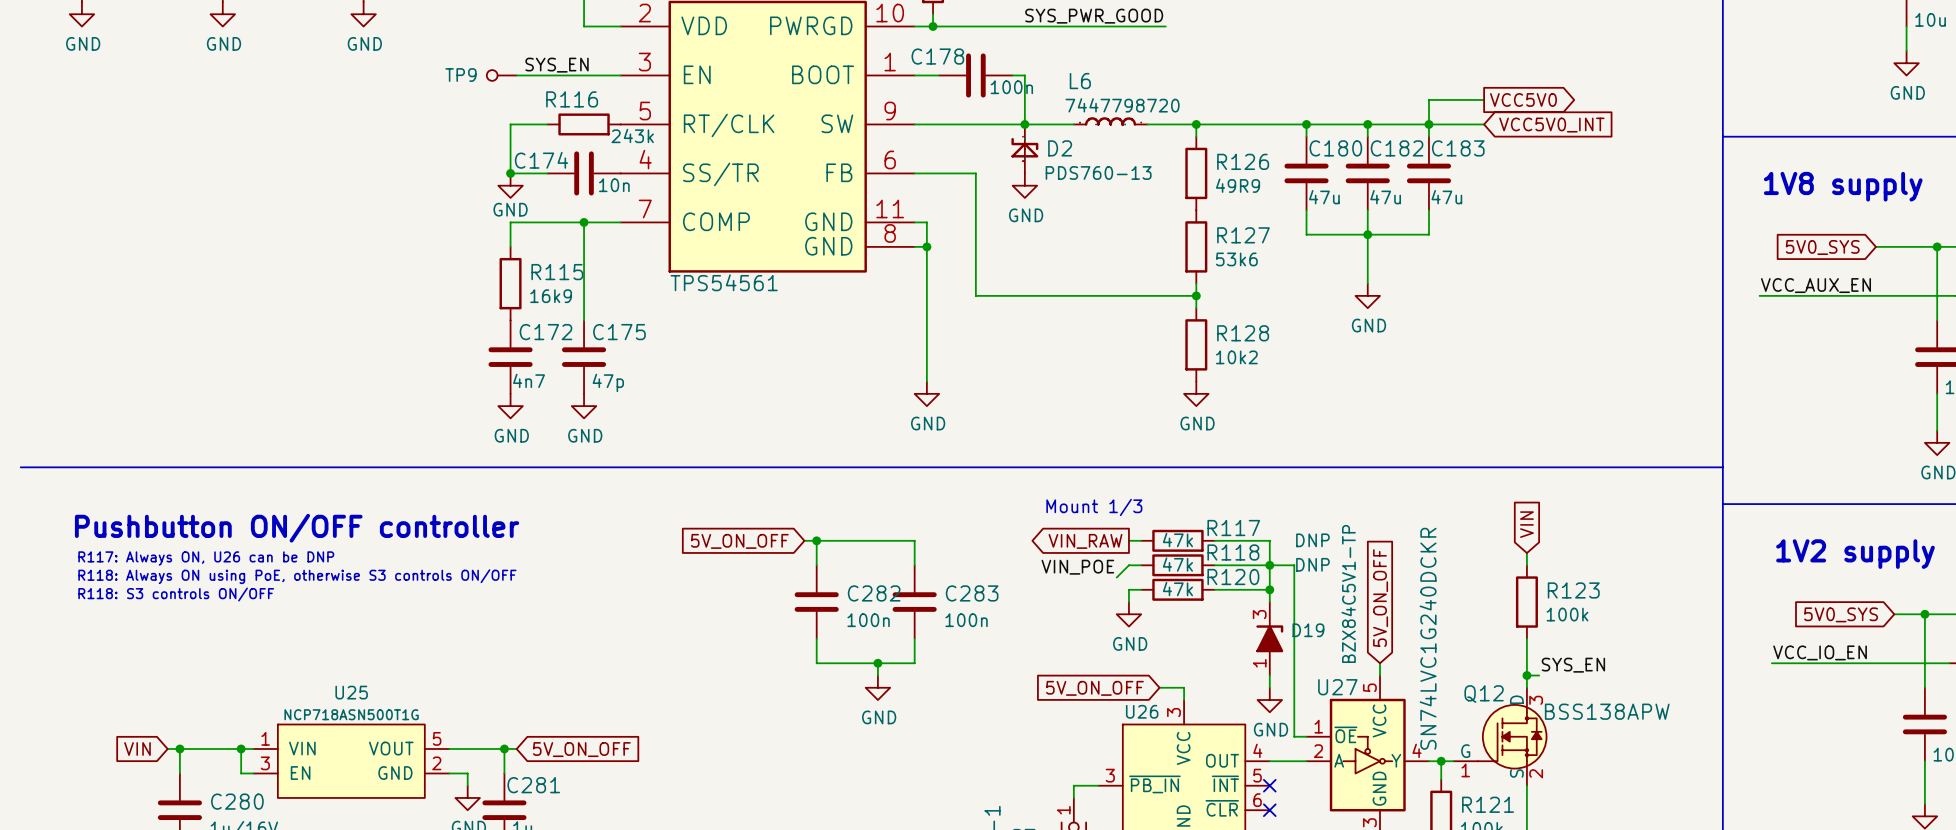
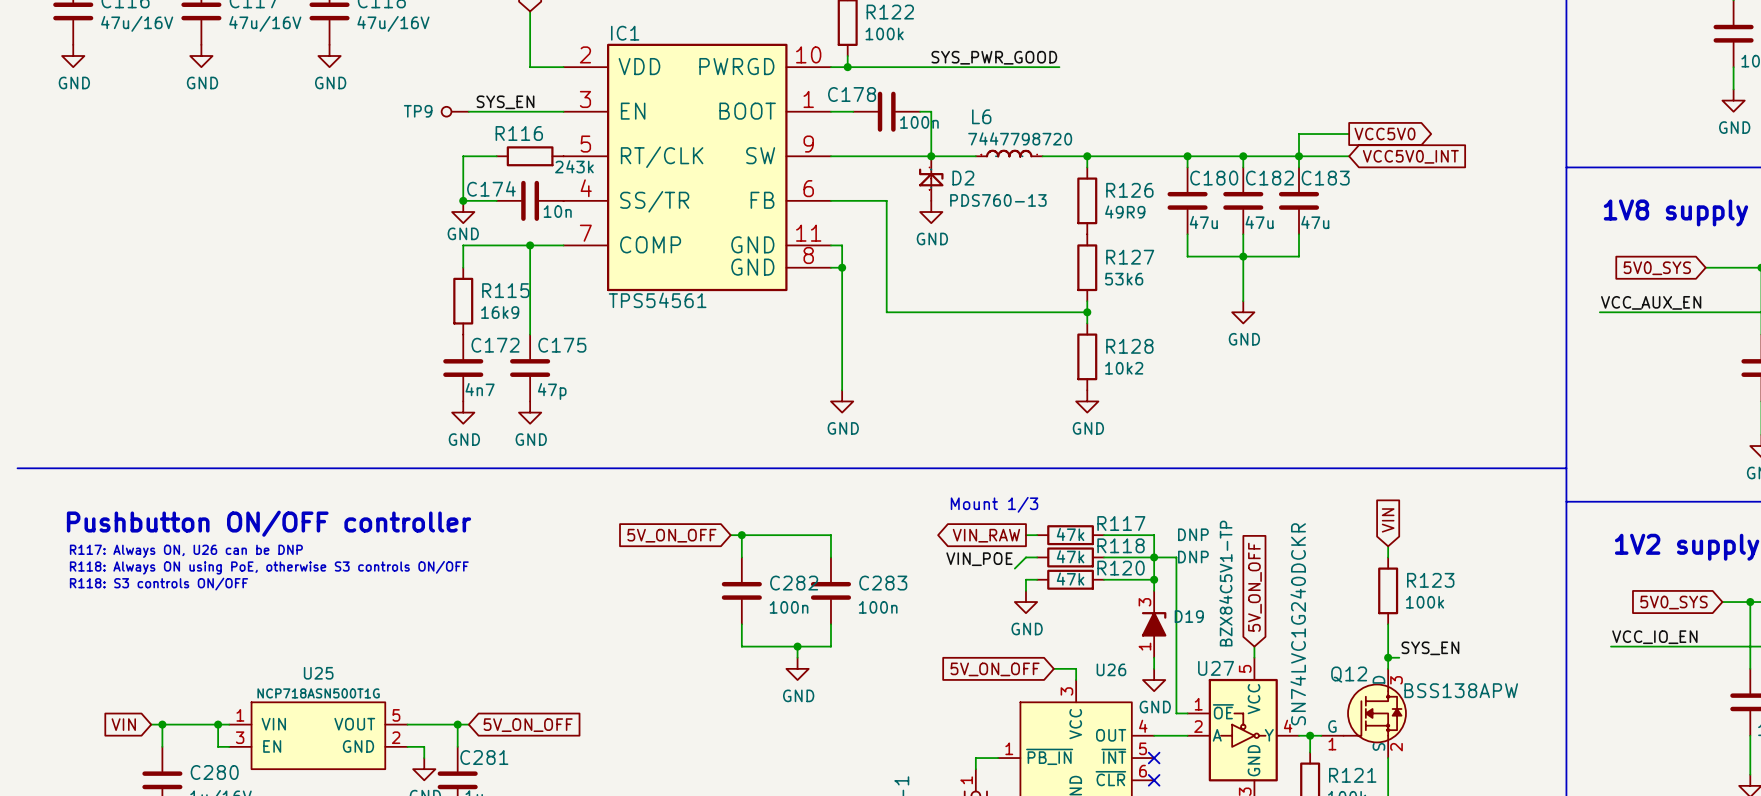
U26 name position: U26 (1142, 711) -> U26 (1111, 669)
U26 pin number: 3 (1110, 775) -> 1 (1009, 748)

